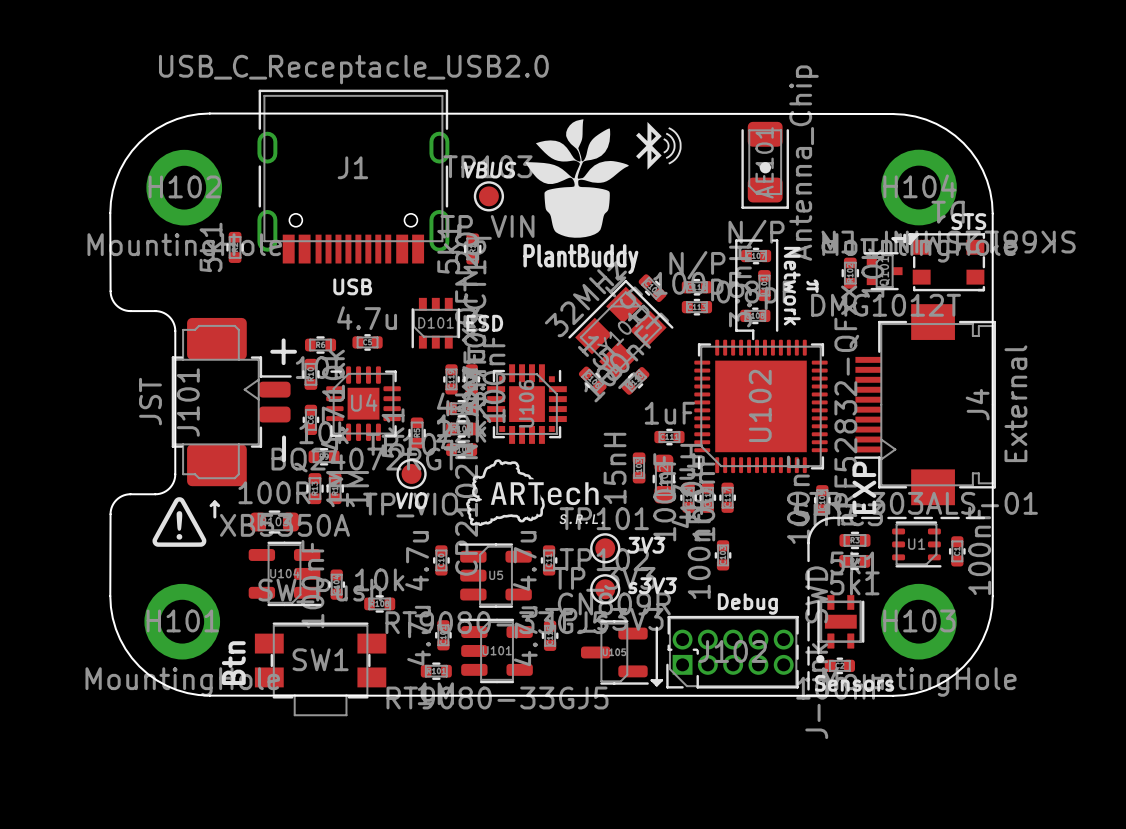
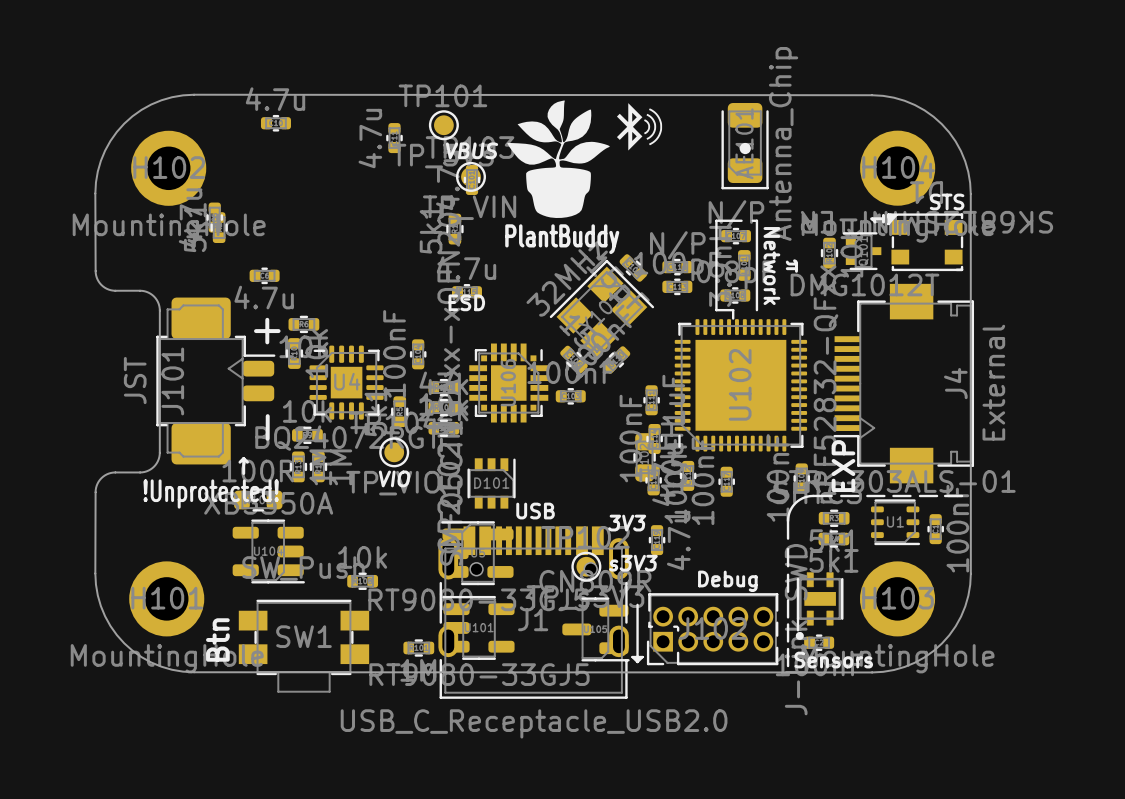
J1 rotation: 0° (353, 176) -> 180° (533, 612)
J1 position: (353, 176) -> (533, 612)
text position: USB (352, 286) -> USB (535, 511)
D101 rotation: 0° (435, 323) -> 180° (491, 483)
D101 position: (435, 323) -> (491, 483)
part rotation: 0° (367, 342) -> 90° clockwise (214, 217)
part position: (367, 342) -> (214, 217)
part position: (451, 379) -> (657, 540)
part position: (471, 379) -> (653, 480)
part rotation: 0° (310, 419) -> 90° clockwise (264, 275)
part position: (310, 419) -> (264, 275)
part rotation: 0° (669, 437) -> 90° clockwise (651, 400)
drawing: [466, 459, 604, 527] -> none
part: 15nH (639, 467) -> none
drawing: [152, 497, 207, 547] -> none
part position: (688, 497) -> (654, 439)
part position: (727, 497) -> (726, 481)
text position: ↑ (214, 509) -> ↑ (243, 465)
text: none -> !Unprotected! (211, 494)
TP101 position: (605, 548) -> (443, 125)
part rotation: 0° (723, 555) -> 90° clockwise (570, 396)
part position: (723, 555) -> (570, 396)
part rotation: 0° (441, 560) -> 90° clockwise (275, 123)
part position: (441, 560) -> (275, 123)
part position: (549, 560) -> (394, 138)
part position: (336, 584) -> (418, 354)
part position: (443, 635) -> (471, 179)
part rotation: 0° (550, 635) -> 90° clockwise (466, 292)
part position: (550, 635) -> (466, 292)

